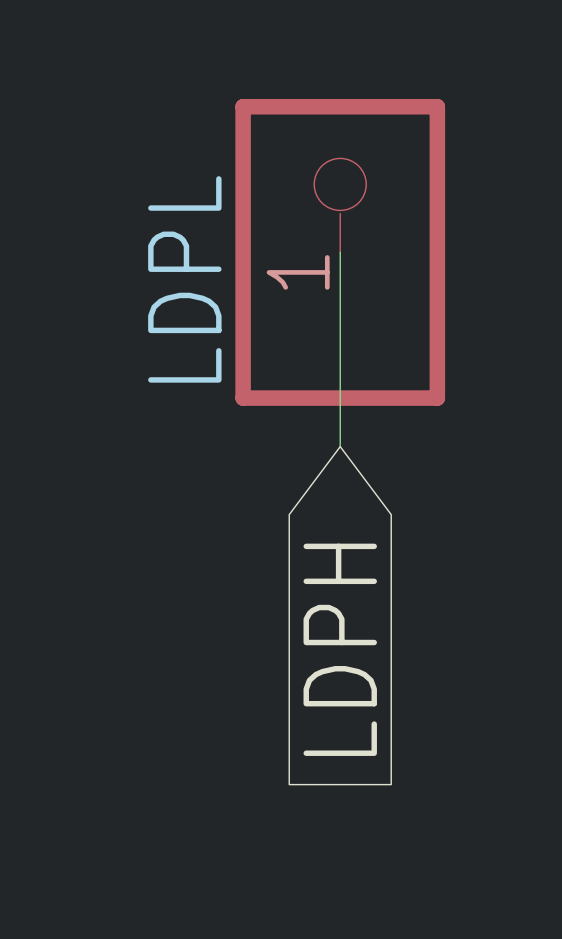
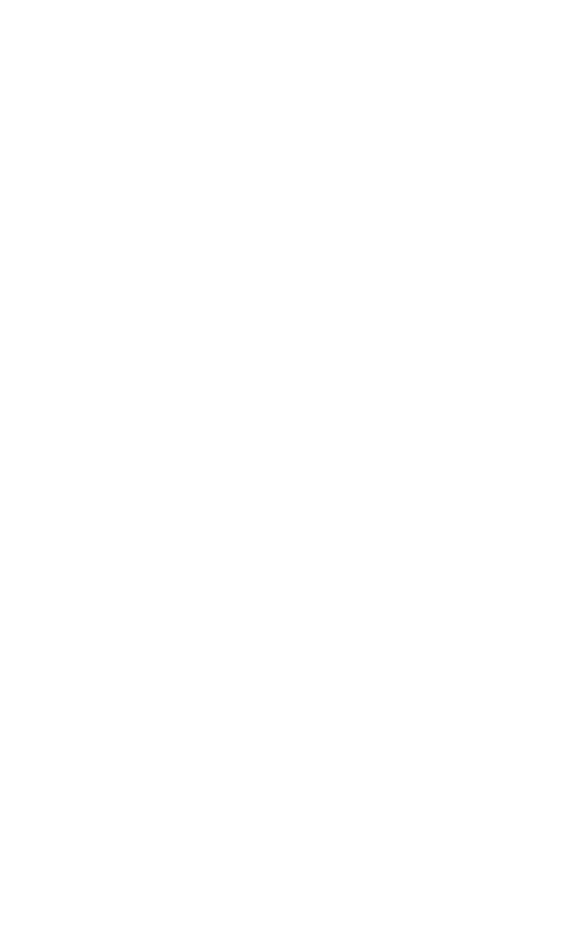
wire: (340, 252) (340, 446) -> none
LDPL: (340, 252) -> none
global label: LDPH (340, 649) -> none

